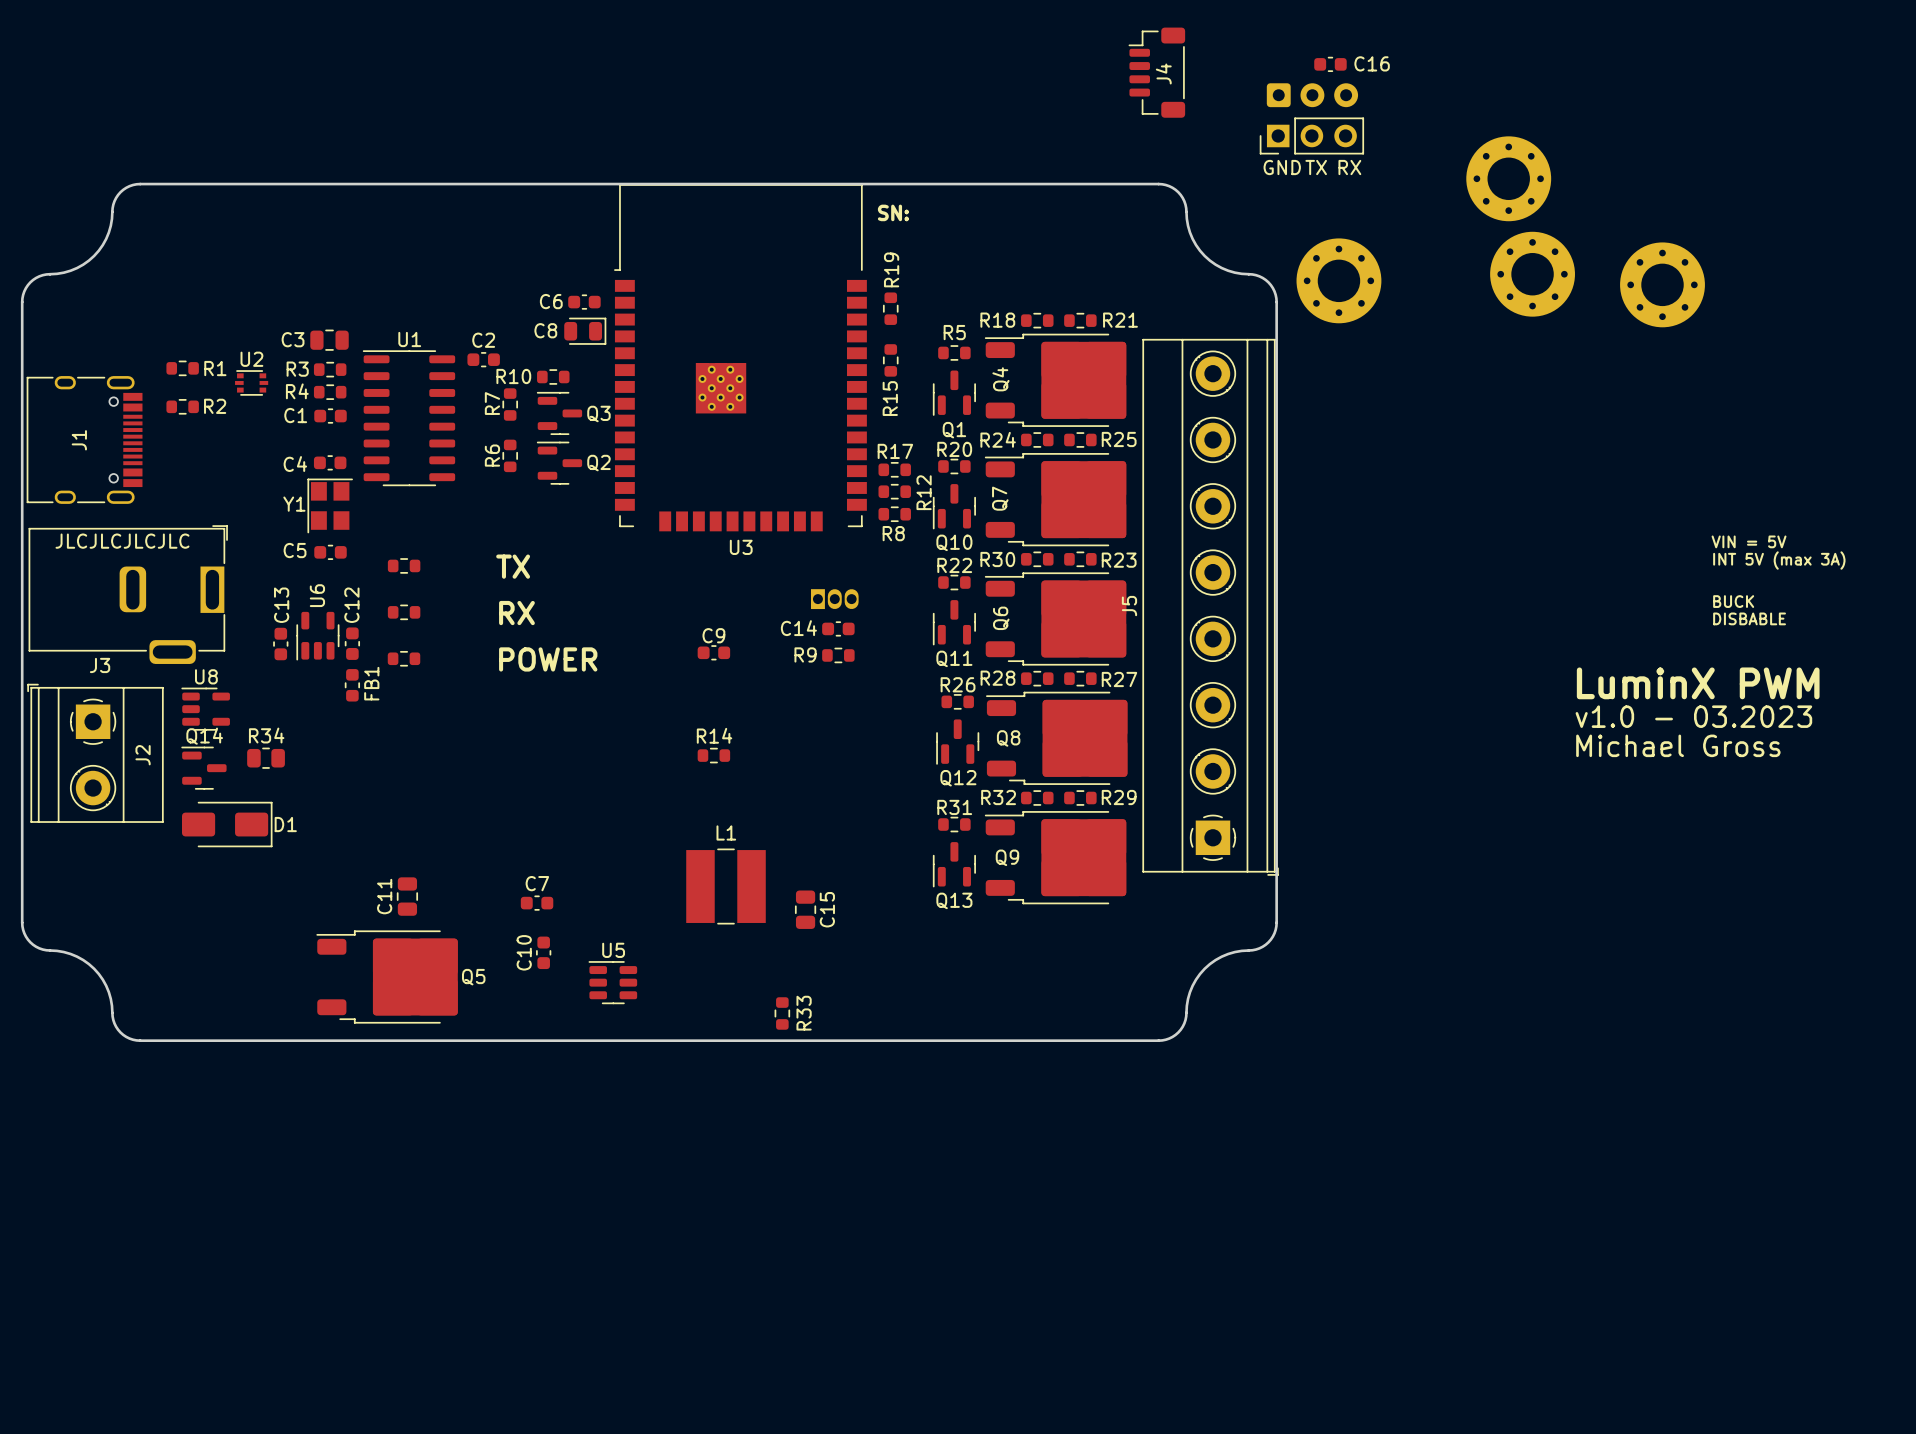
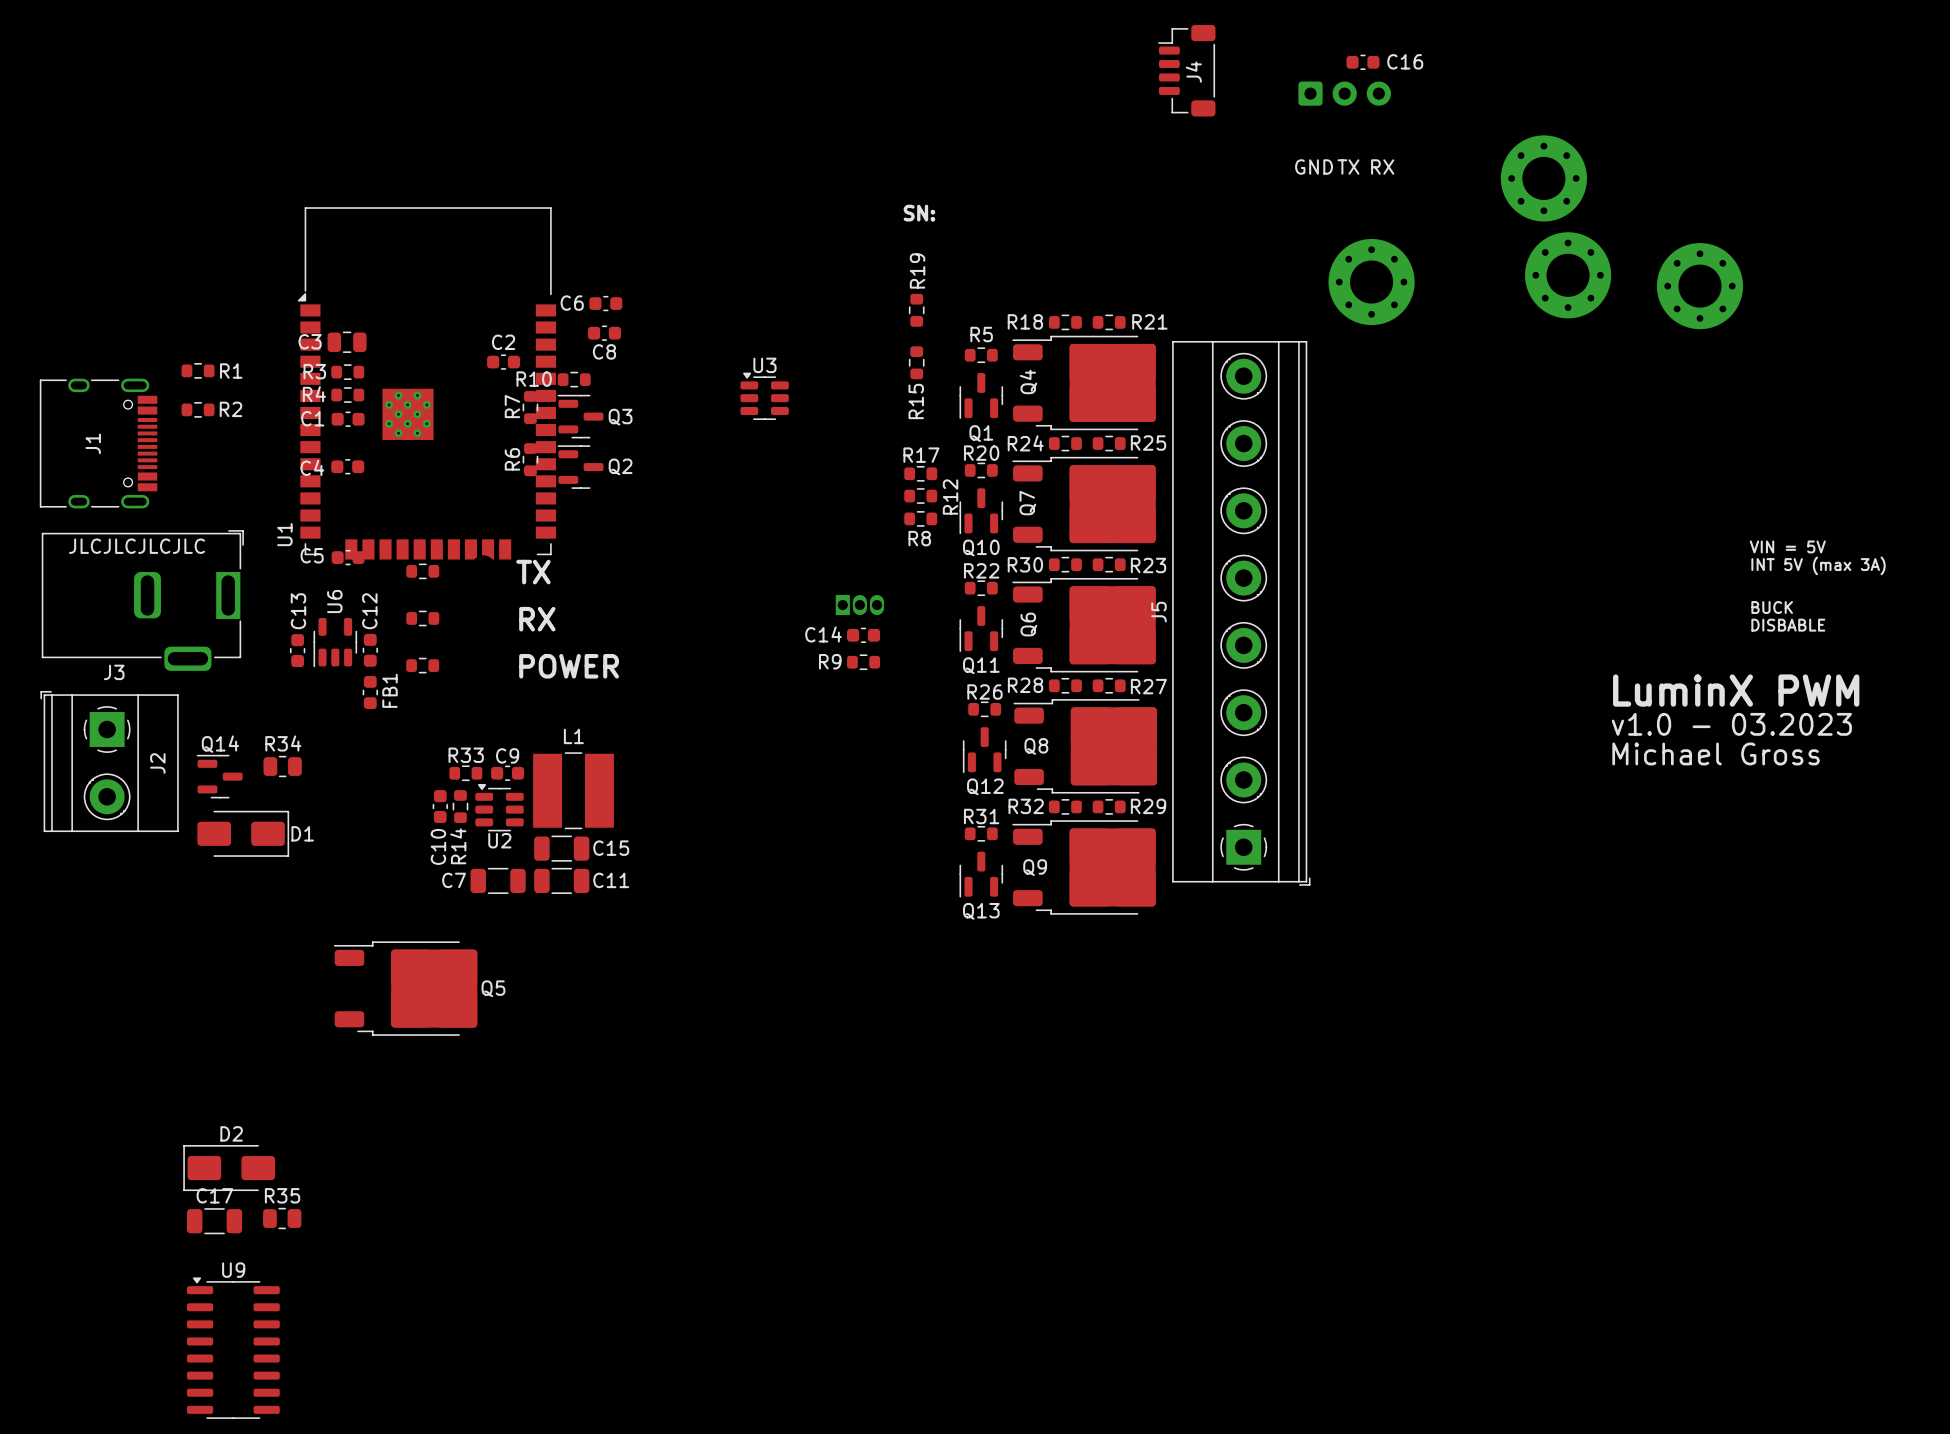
part: (1311, 135) -> none
board edge: (140, 184) (1158, 184) (1172, 187) (1184, 201) (1189, 232) (1196, 245) (1204, 255) (1215, 264) (1228, 270) (1262, 277) (1270, 285) (1276, 298) (1276, 922) (1272, 936) (1259, 948) (1228, 953) (1215, 960) (1204, 968) (1196, 979) (1189, 992) (1182, 1026) (1172, 1036) (1162, 1040) (140, 1040) (126, 1036) (114, 1023) (108, 992) (102, 979) (94, 968) (83, 960) (70, 954) (36, 946) (25, 936) (22, 926) (22, 302) (25, 288) (36, 277) (70, 270) (83, 264) (94, 255) (102, 245) (108, 232) (116, 197) (126, 187) (140, 184) -> none
U3 footprint: [614, 184, 867, 532] -> [740, 372, 789, 420]
C8 footprint: [564, 317, 607, 345] -> [587, 325, 621, 341]
C8 name position: C8 (545, 330) -> C8 (604, 351)
U1 name position: U1 (409, 339) -> U1 (284, 534)
U1 footprint: [362, 350, 456, 487] -> [297, 207, 557, 560]
U2 name position: U2 (251, 359) -> U2 (499, 840)
U2 footprint: [235, 370, 269, 396] -> [475, 784, 524, 832]
Y1: (330, 505) -> none
U3 name position: U3 (741, 547) -> U3 (764, 365)
C9 position: (713, 652) -> (507, 773)
U8: (205, 709) -> none
R14 name position: R14 (714, 735) -> R14 (458, 846)
R14 rotation: 0° (713, 755) -> 90° clockwise (460, 806)
R14 position: (713, 755) -> (460, 806)
C11 footprint: [396, 877, 418, 916] -> [534, 867, 590, 894]
C7 name position: C7 (537, 883) -> C7 (454, 880)
L1 position: (726, 886) -> (573, 790)
C15 footprint: [795, 890, 817, 929] -> [534, 835, 590, 862]
C7 footprint: [520, 895, 554, 911] -> [470, 867, 526, 894]
C11 name position: C11 (384, 896) -> C11 (611, 880)
C10 name position: C10 (524, 952) -> C10 (438, 846)
C10 position: (543, 952) -> (440, 806)
U5: (612, 982) -> none
R33 rotation: 0° (782, 1013) -> 90° clockwise (465, 773)
R33 position: (782, 1013) -> (465, 773)
R33 name position: R33 (804, 1013) -> R33 (466, 755)
D2: none -> (229, 1168)
R35: none -> (282, 1218)
C17: none -> (214, 1221)
U9: none -> (233, 1348)

